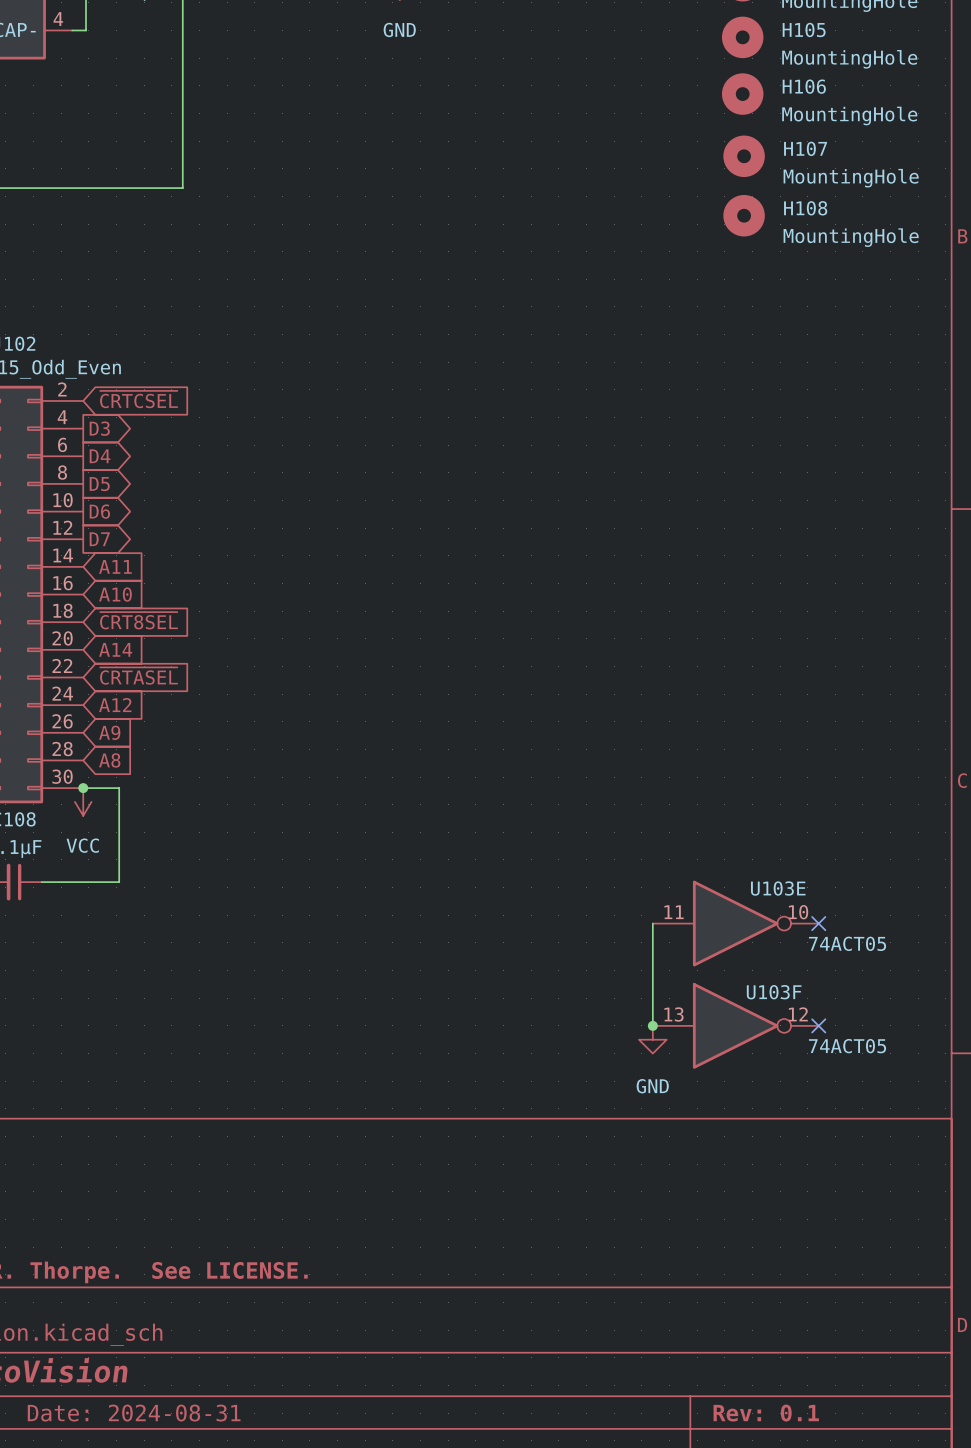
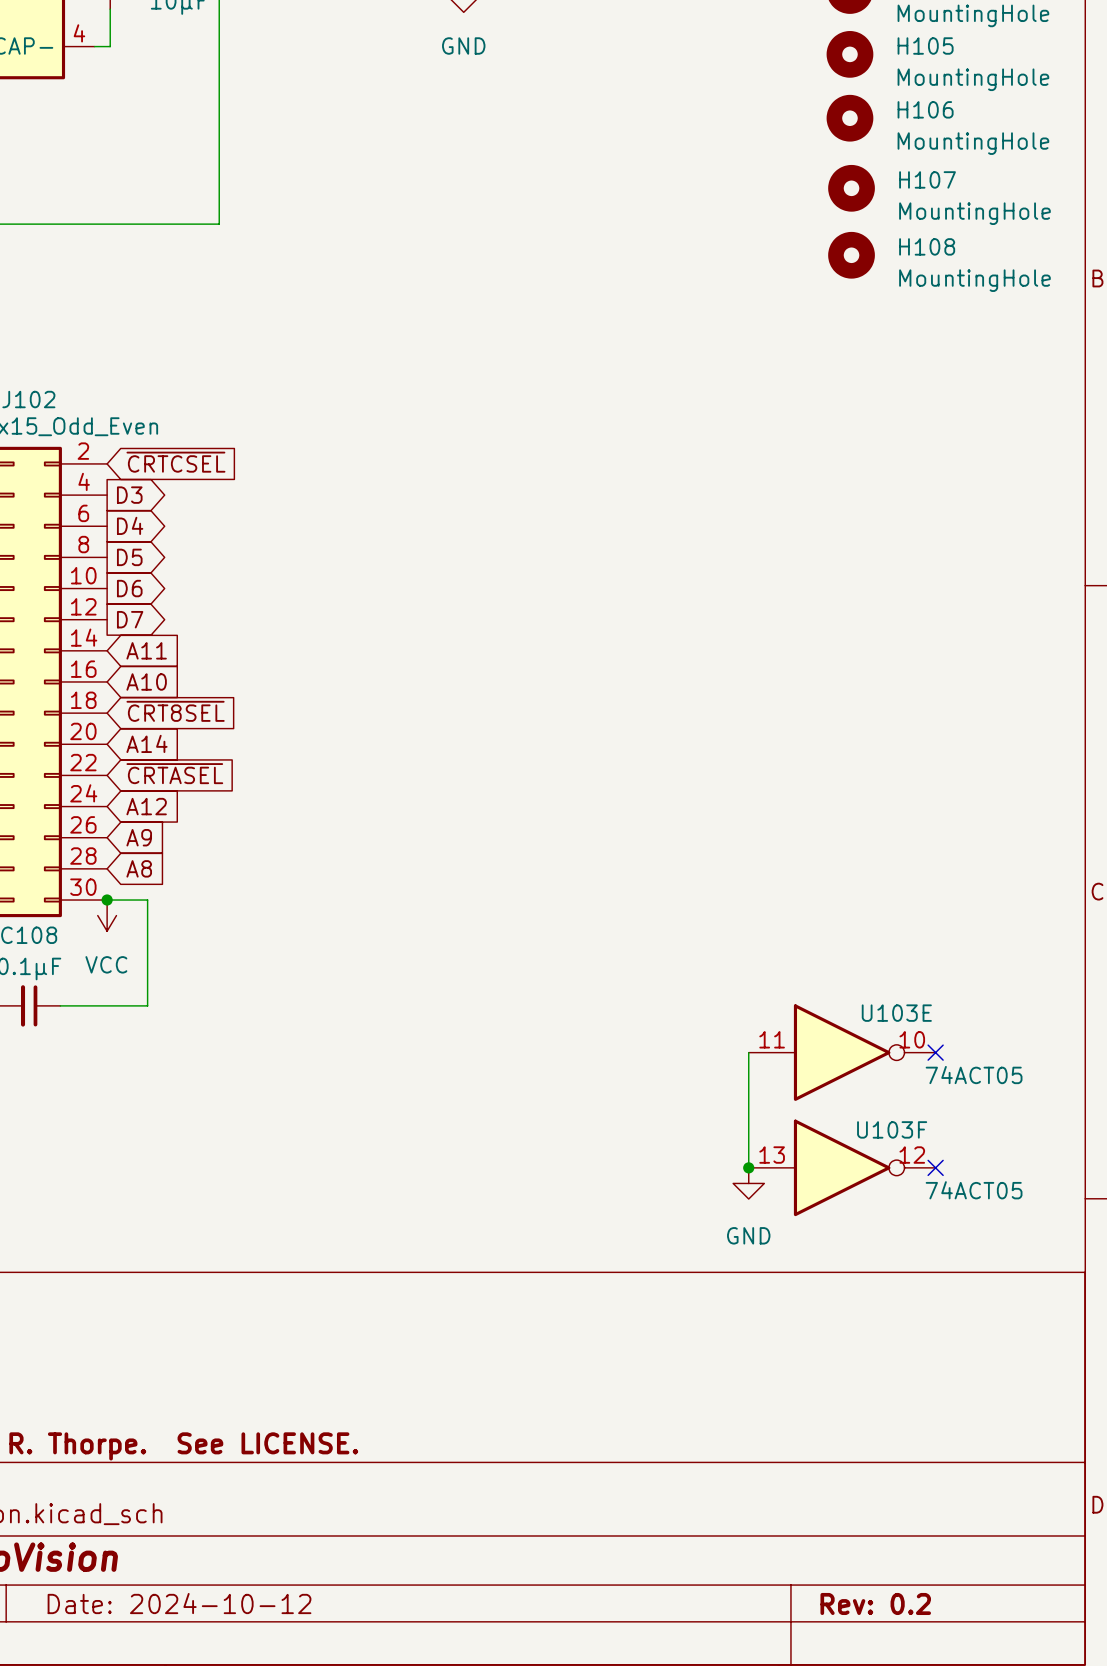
title block: Date: 2024-08-31 (134, 1413) -> Date: 2024-10-12 (179, 1603)
title block: Rev: 0.1 (766, 1413) -> Rev: 0.2 (875, 1603)

